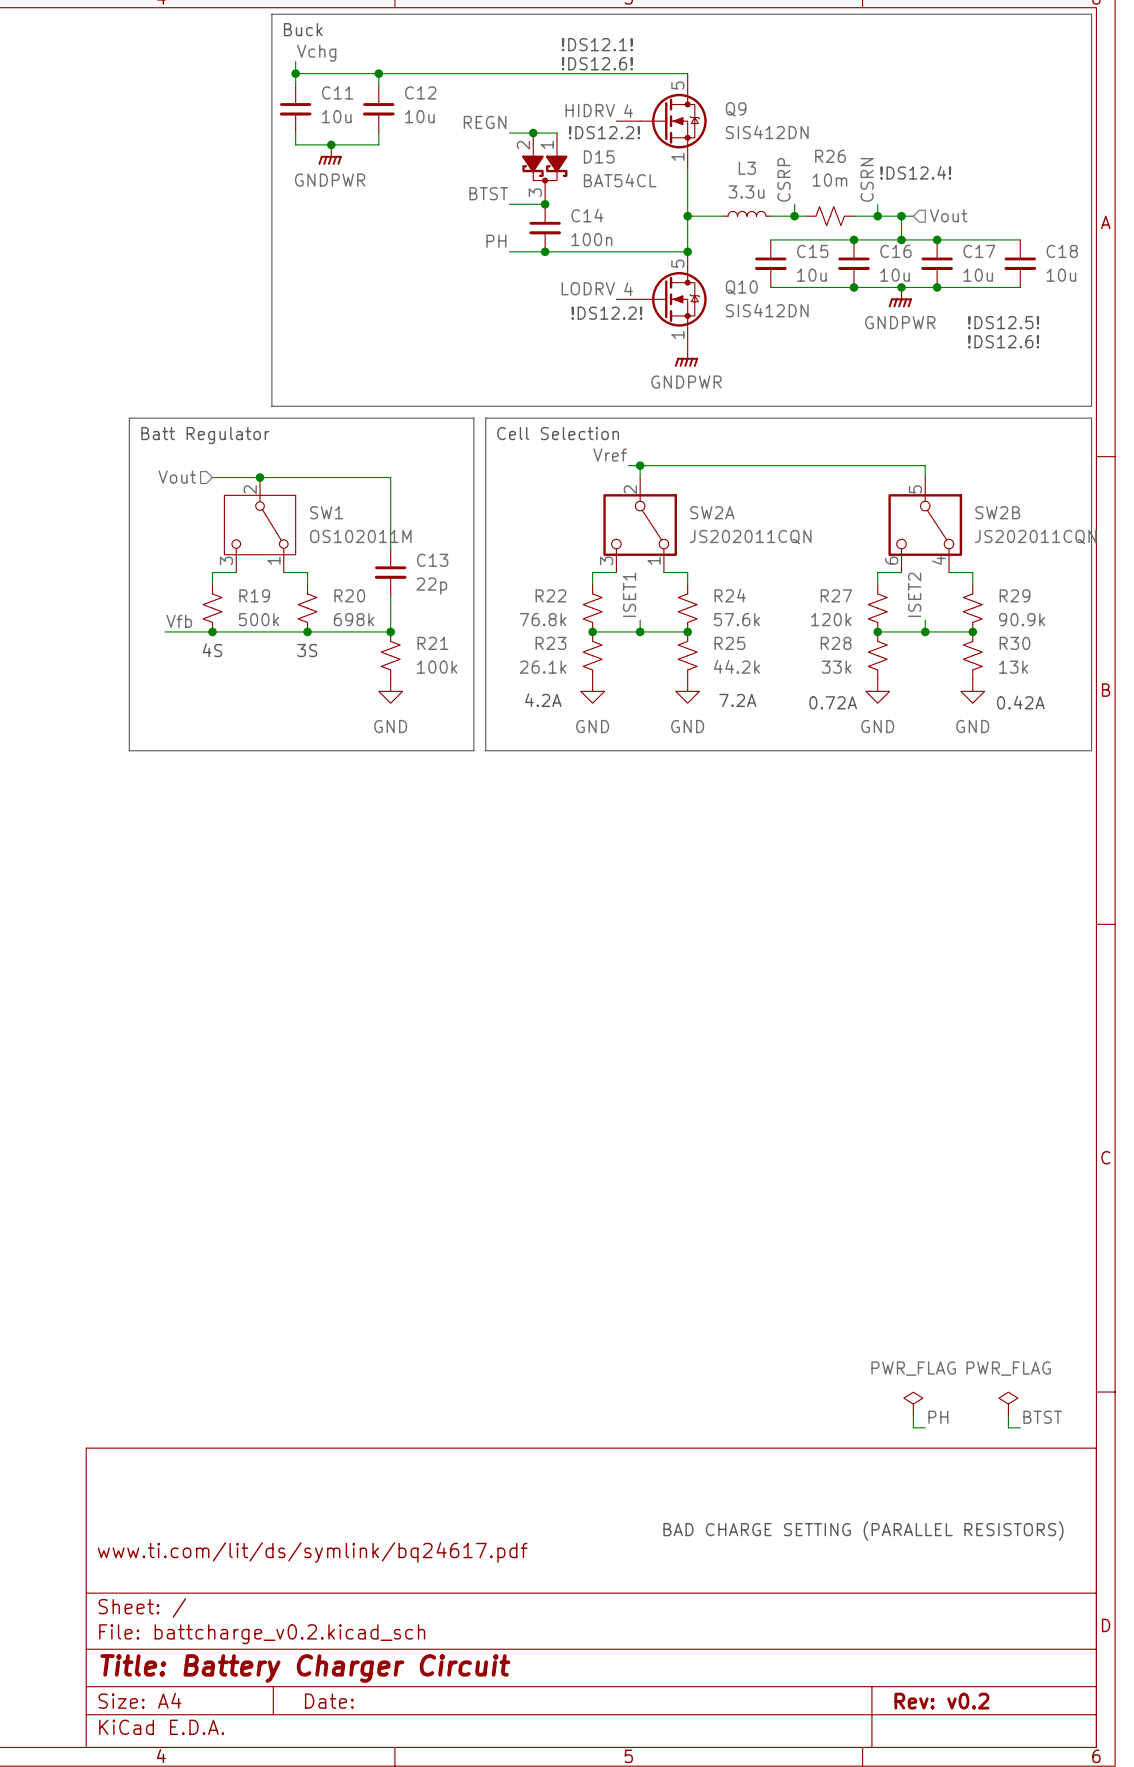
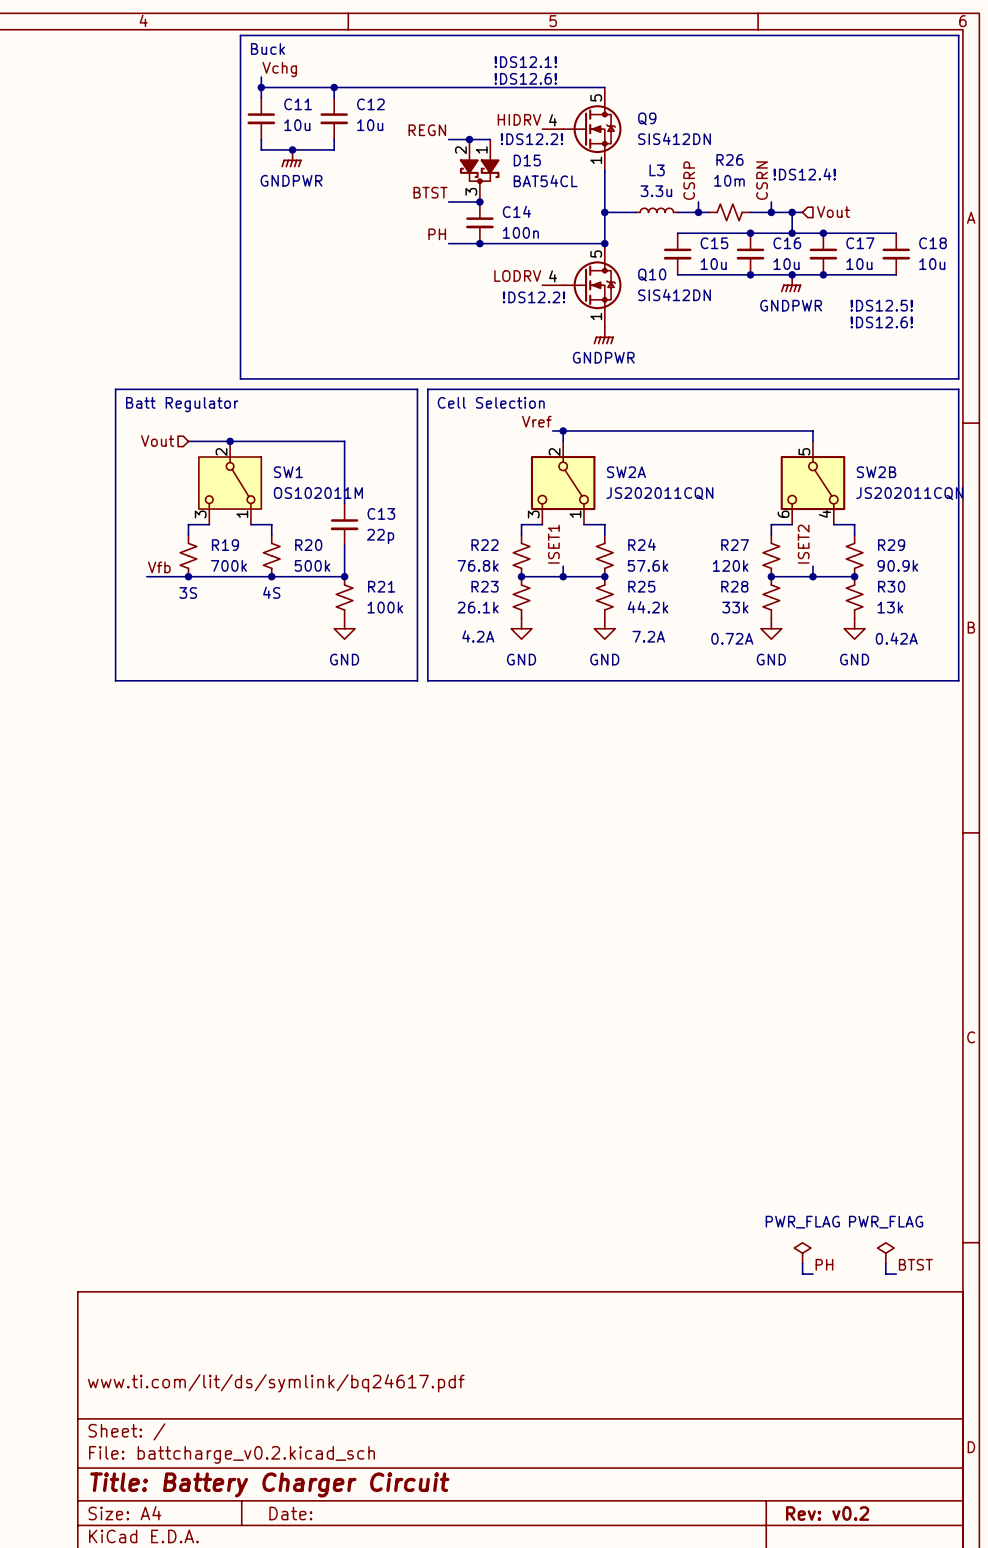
R19 value: 500k (258, 619) -> 700k (228, 565)
R20 value: 698k (354, 619) -> 500k (312, 565)
text: 4S (212, 650) -> 3S (188, 593)
text: 3S (307, 650) -> 4S (271, 592)
text: BAD CHARGE SETTING (PARALLEL RESISTORS) (863, 1531) -> none

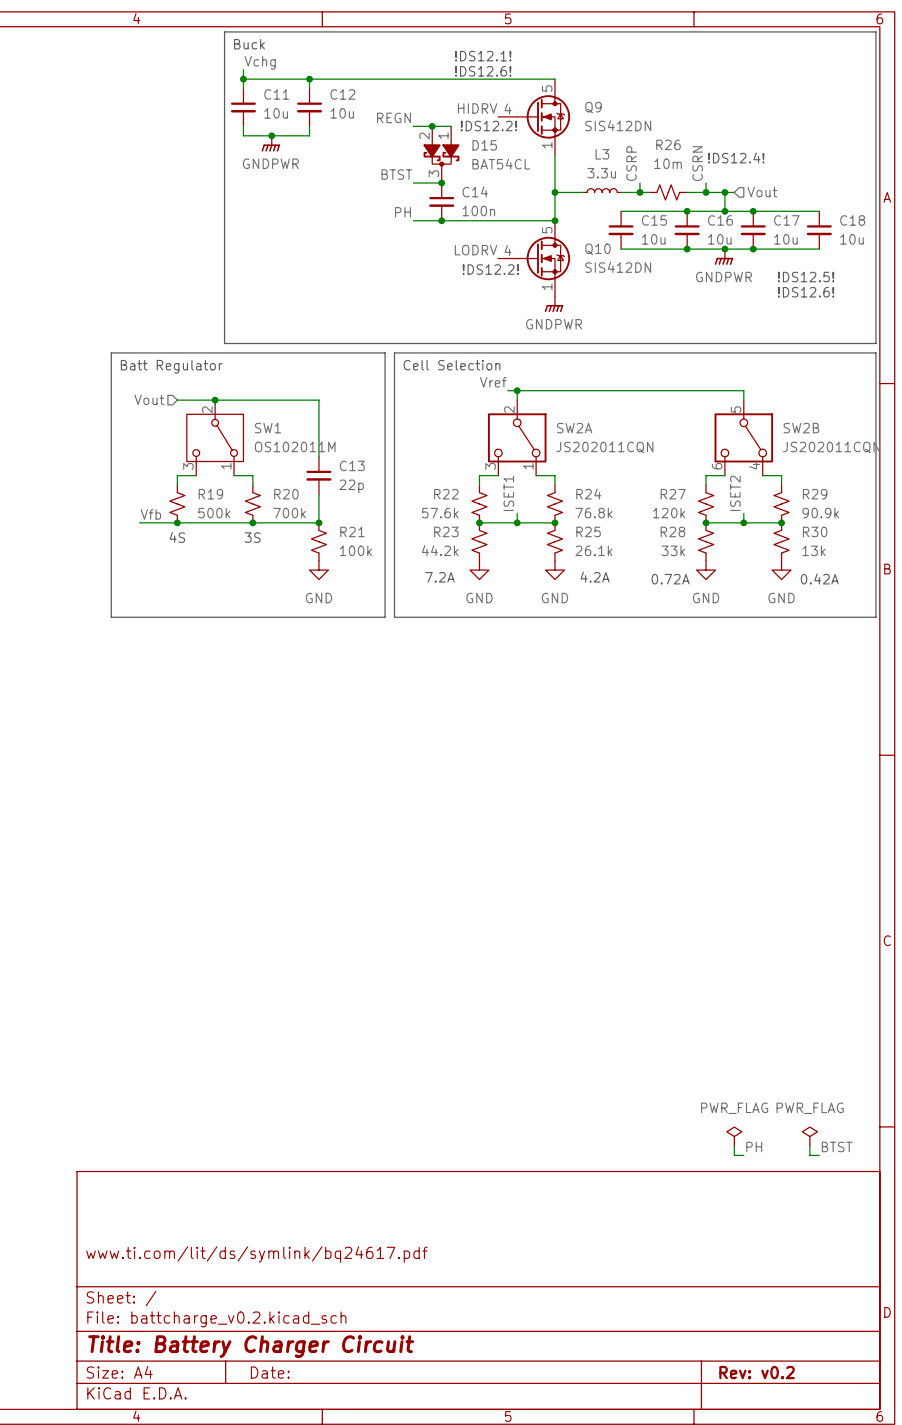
R19 value: 700k (228, 565) -> 500k (214, 513)
R20 value: 500k (312, 565) -> 700k (289, 513)
R22 value: 76.8k (478, 565) -> 57.6k (440, 513)
R24 value: 57.6k (648, 565) -> 76.8k (593, 513)
text: 4S (271, 592) -> 3S (252, 537)
text: 3S (188, 593) -> 4S (177, 537)
R23 value: 26.1k (478, 607) -> 44.2k (440, 550)
R25 value: 44.2k (648, 607) -> 26.1k (593, 550)
text: 4.2A (478, 636) -> 7.2A (440, 577)
text: 7.2A (648, 636) -> 4.2A (595, 577)

